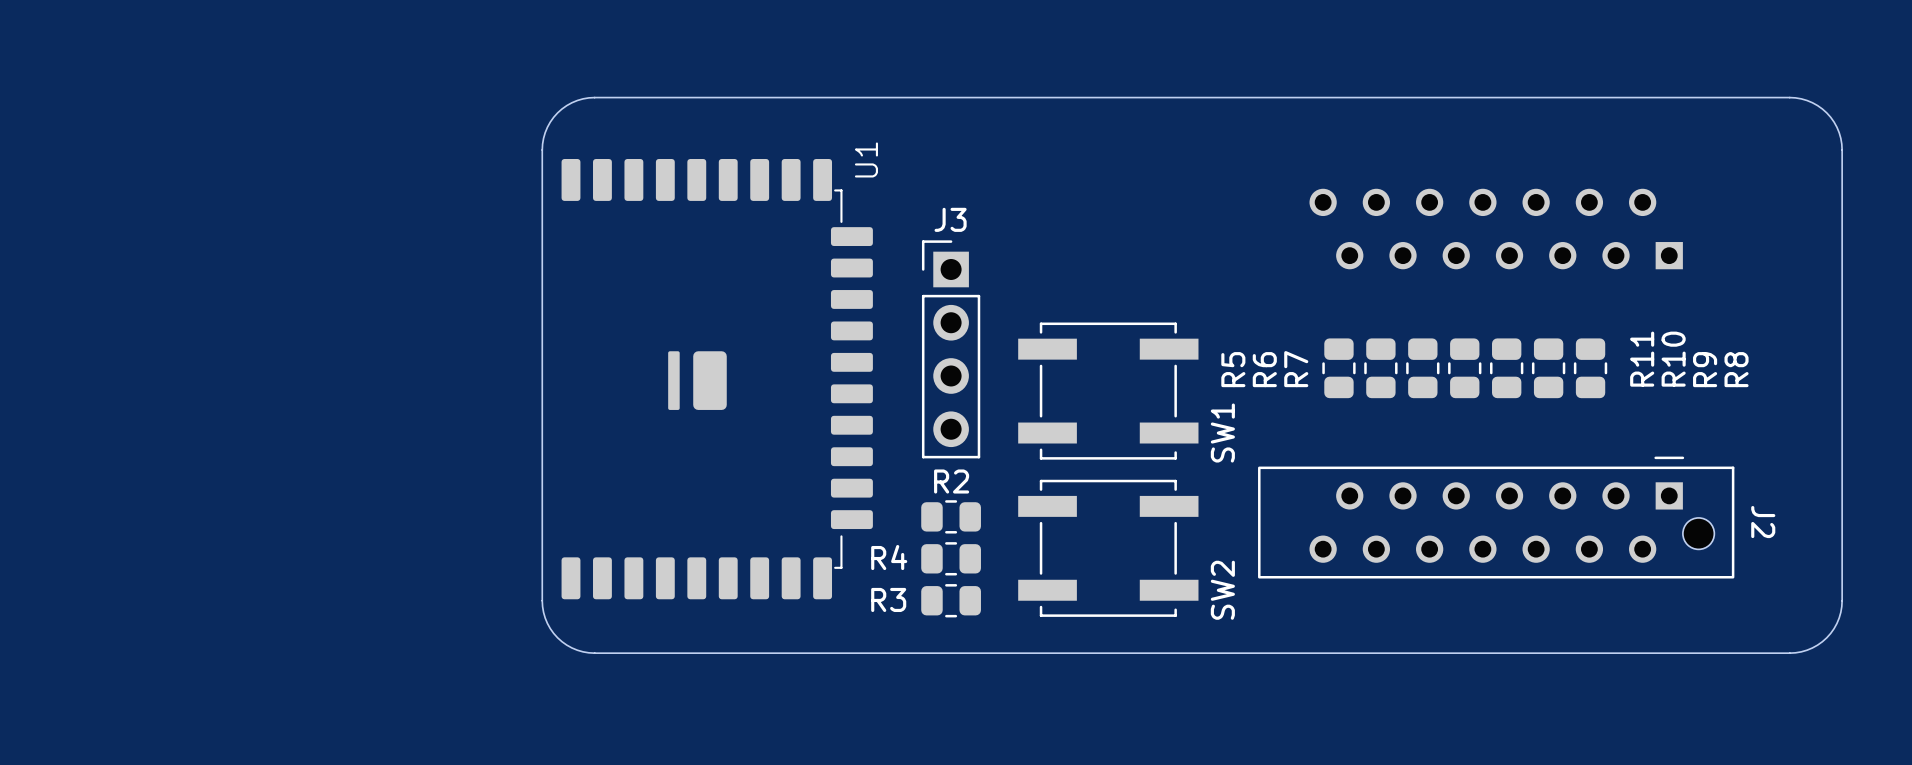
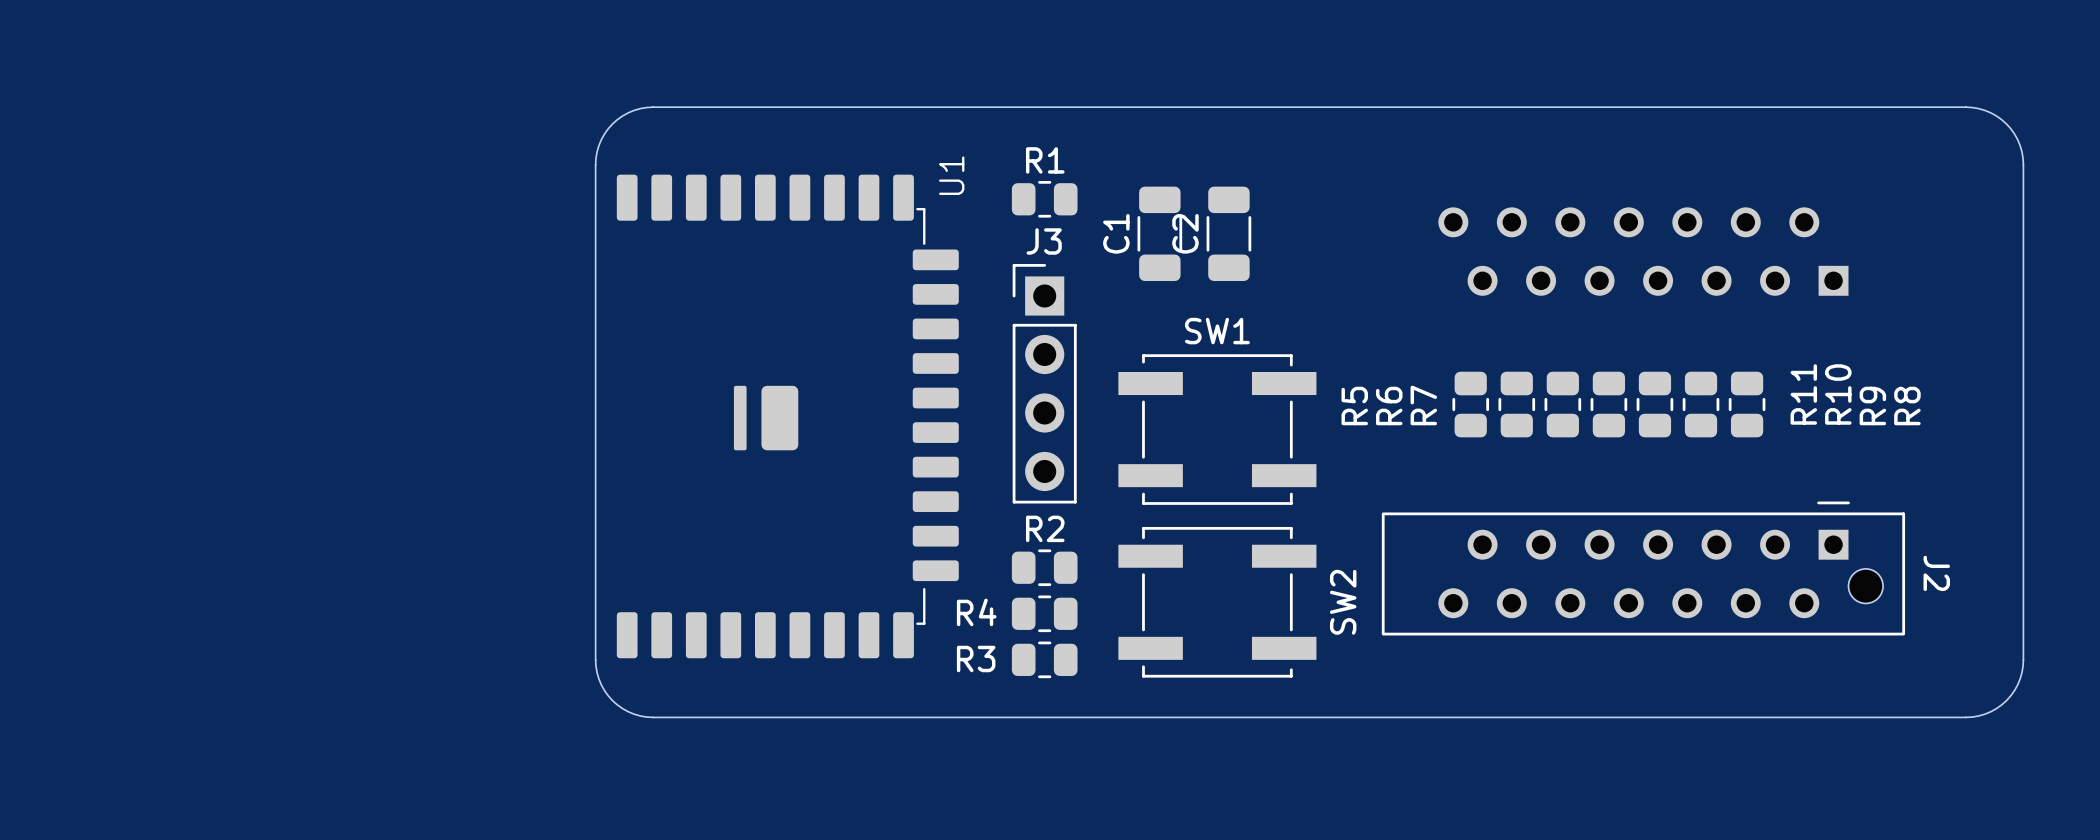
R1: none -> (1044, 199)
C1: none -> (1159, 233)
C2: none -> (1228, 233)
SW1 rotation: 0° (1108, 391) -> 180° (1217, 429)
SW1 name position: SW1 (1222, 433) -> SW1 (1217, 331)
SW2 name position: SW2 (1222, 590) -> SW2 (1343, 602)

